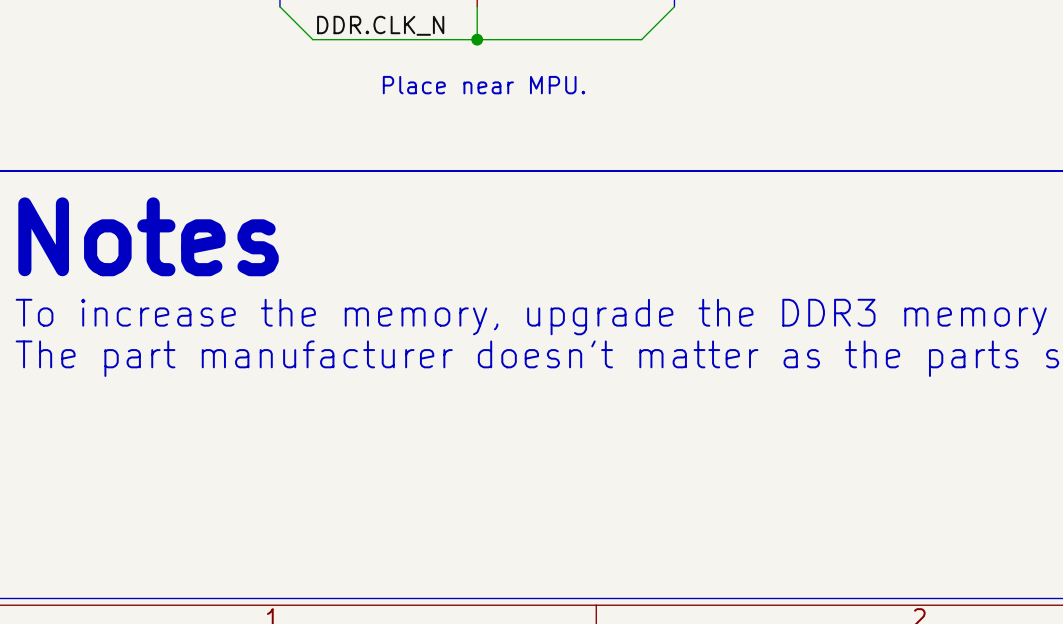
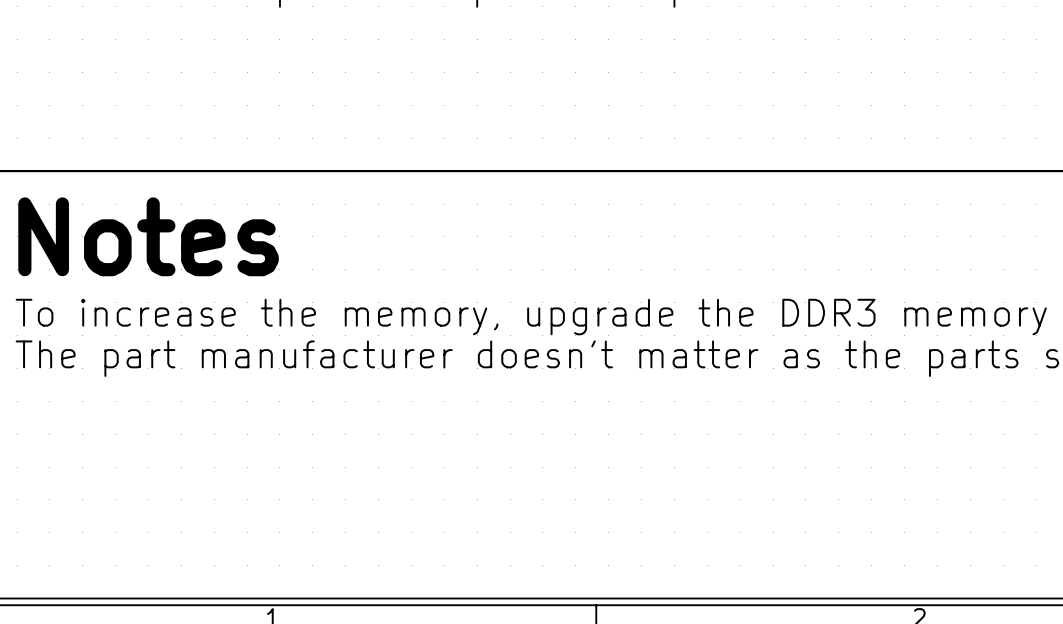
wire: (279, 6) (312, 39) (641, 39) (674, 6) -> none
wire: (477, 6) (477, 39) -> none
label: DDR.CLK_N (380, 25) -> none
junction: (477, 39) -> none
text: Place near MPU. (483, 85) -> none

